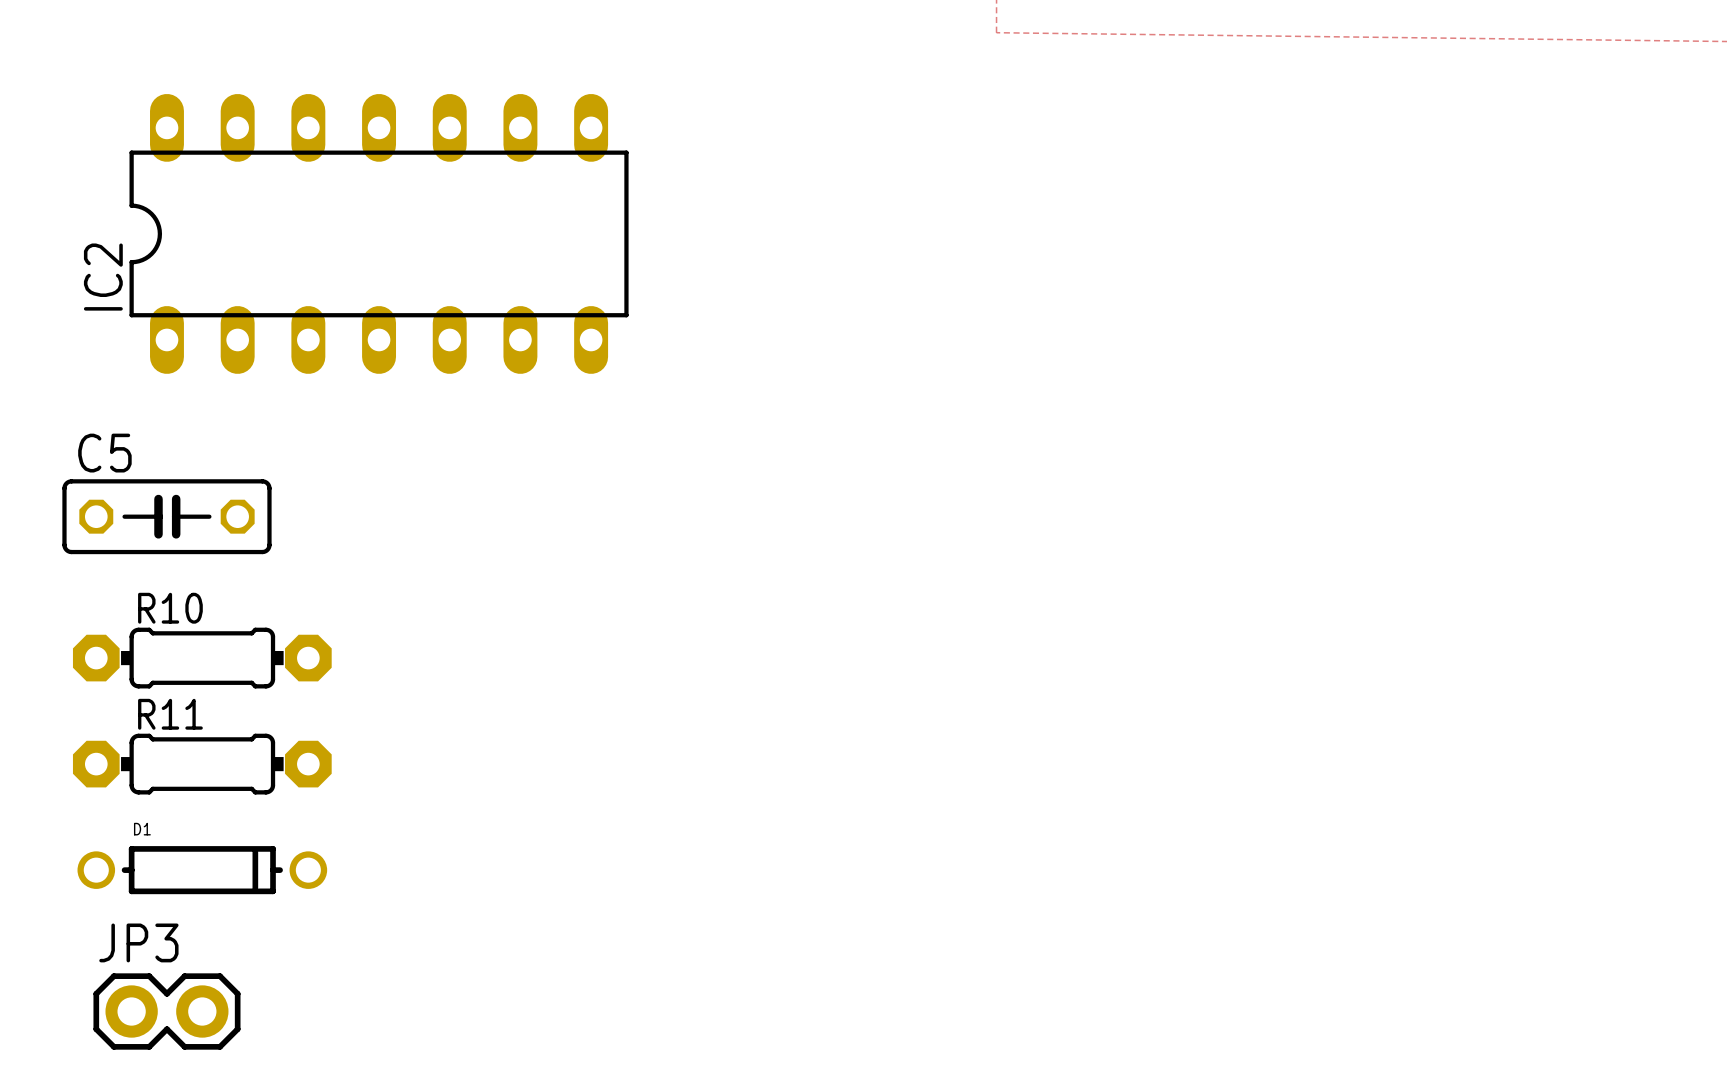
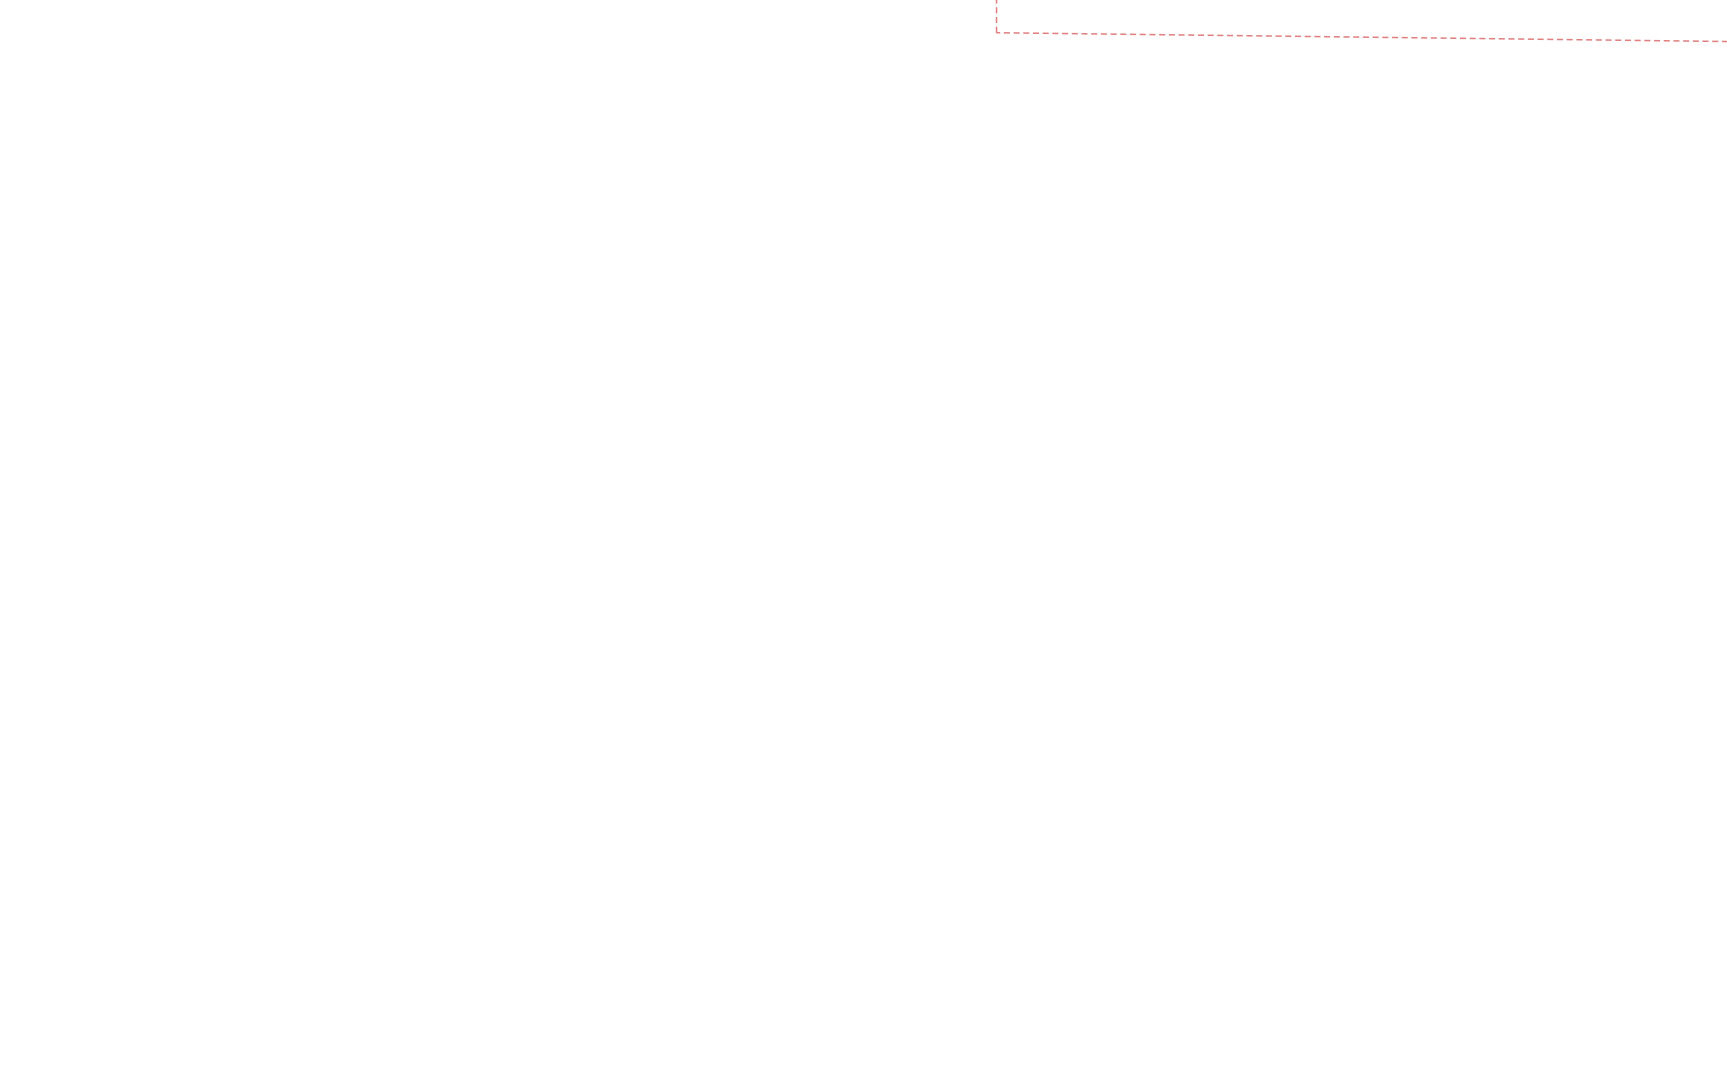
IC2: (379, 233) -> none
C5: (166, 516) -> none
R10: (202, 658) -> none
R11: (202, 764) -> none
D1: (202, 870) -> none
JP3: (166, 1011) -> none

